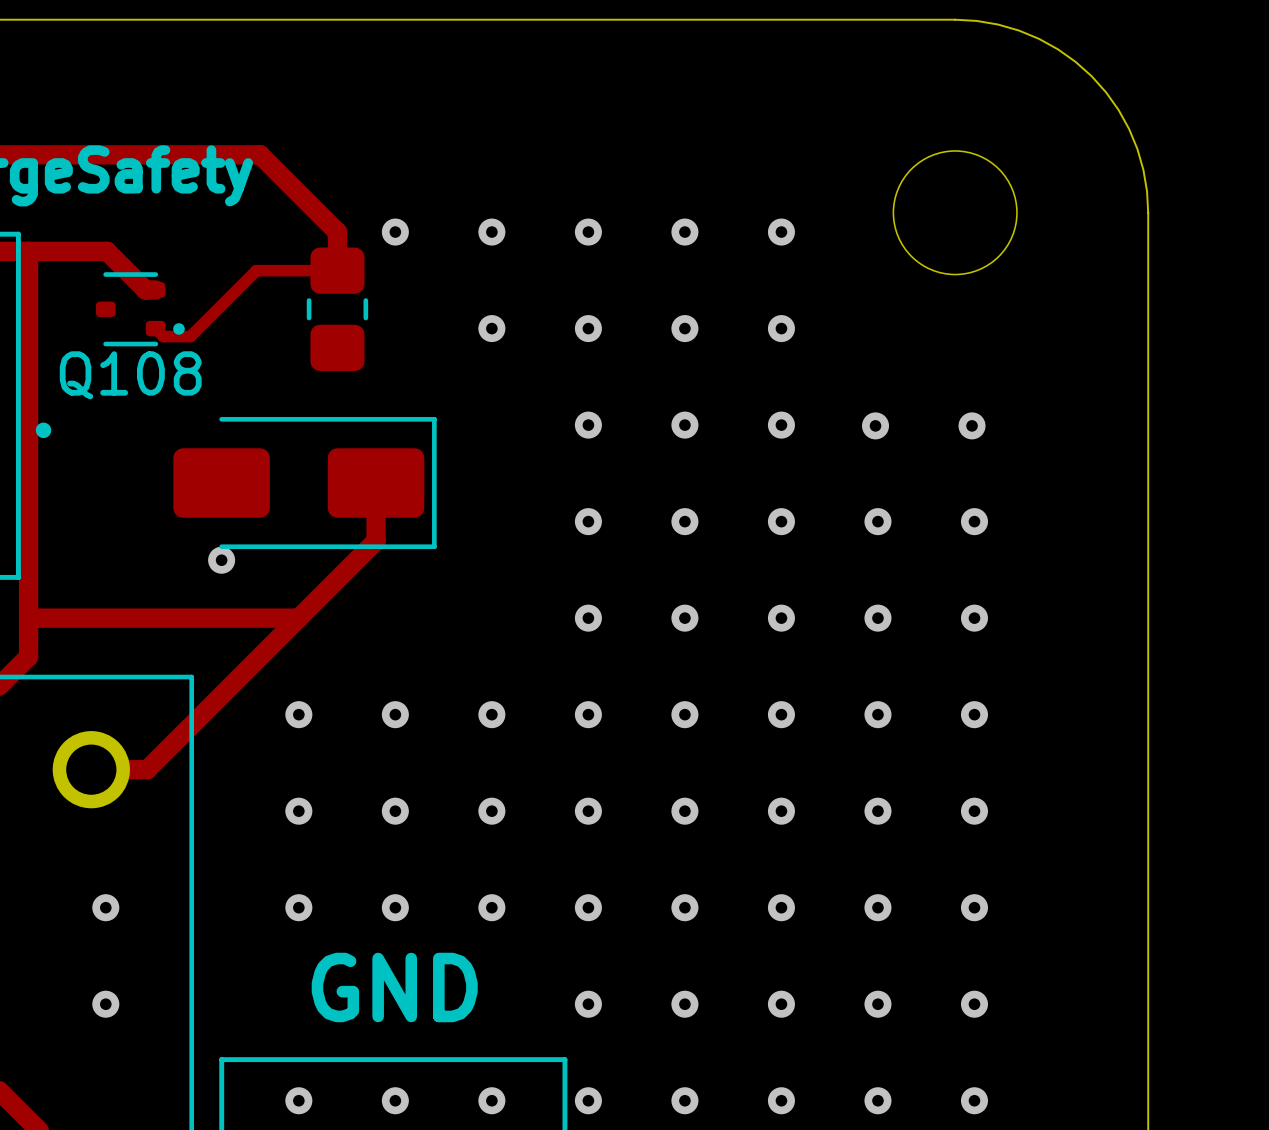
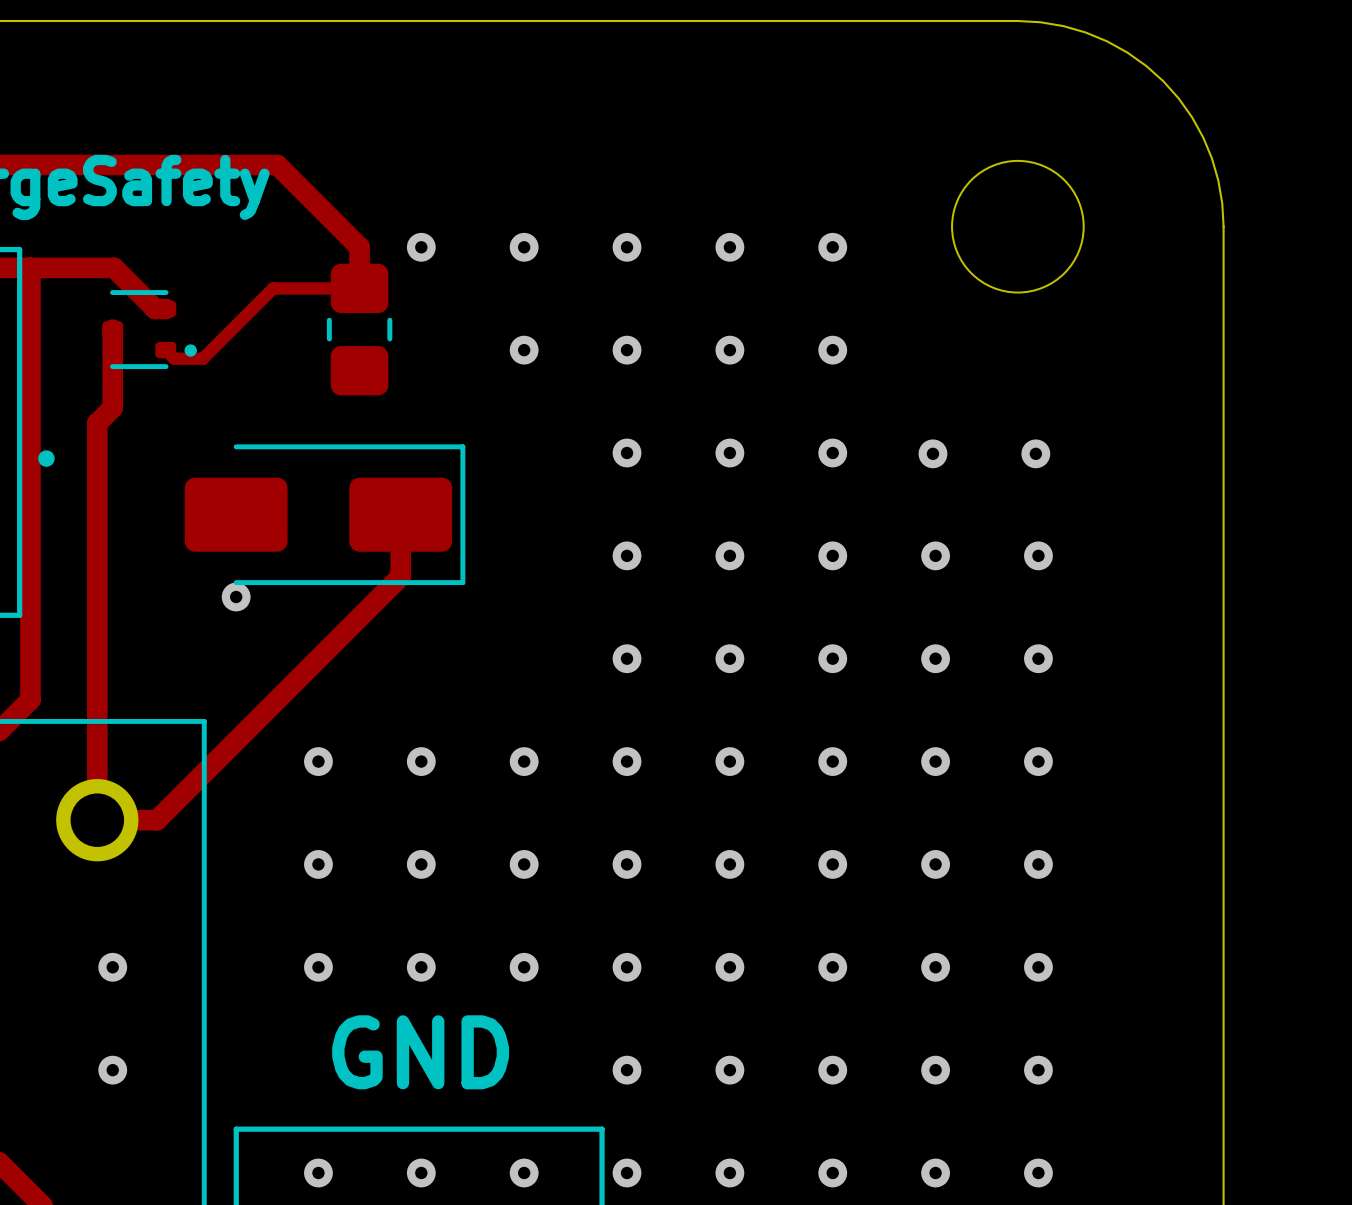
track: none -> (112, 329) (112, 407) (97, 423) (97, 820)
Q108 name: Q108 (130, 375) -> none
track: (28, 618) (298, 618) -> none

